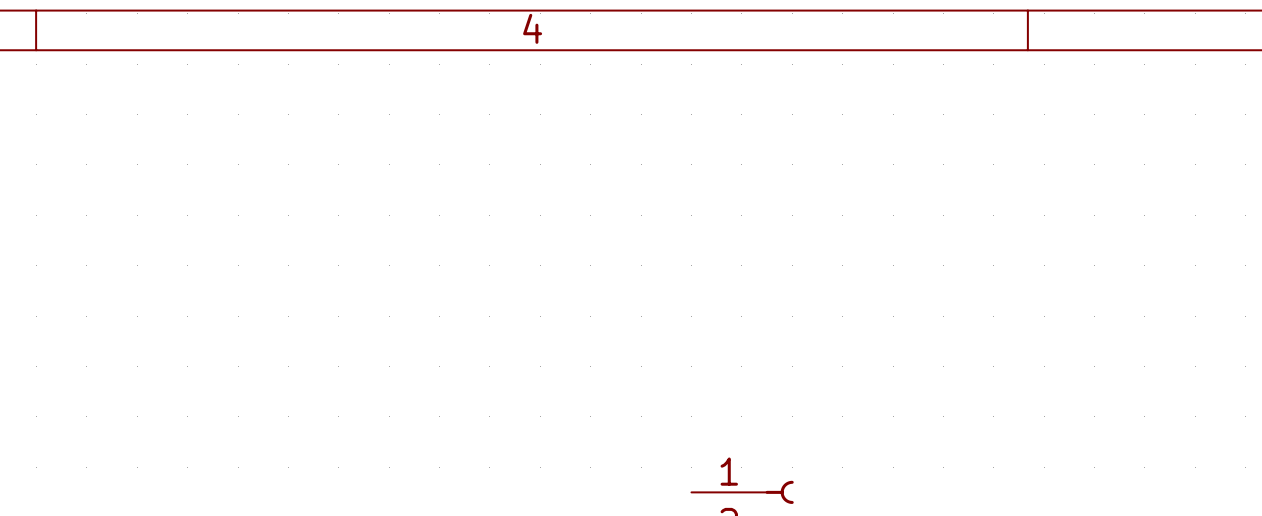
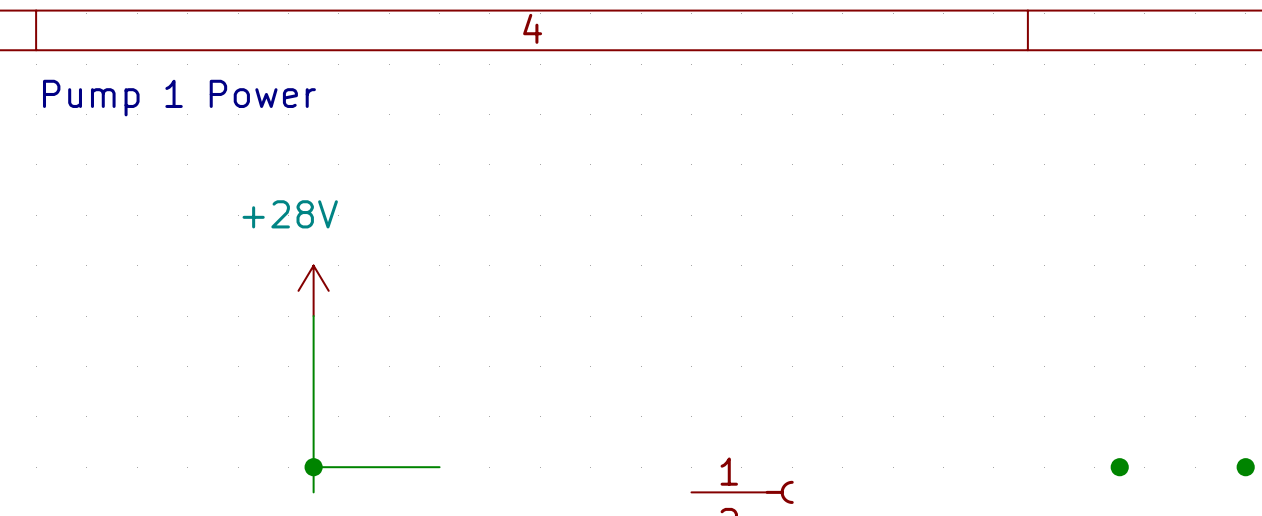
text: none -> Pump 1 Power (179, 98)
power symbol: none -> +28V (313, 290)
wire: none -> (313, 316) (313, 492)
wire: none -> (313, 467) (439, 467)
junction: none -> (313, 467)
junction: none -> (1119, 467)
junction: none -> (1245, 467)

